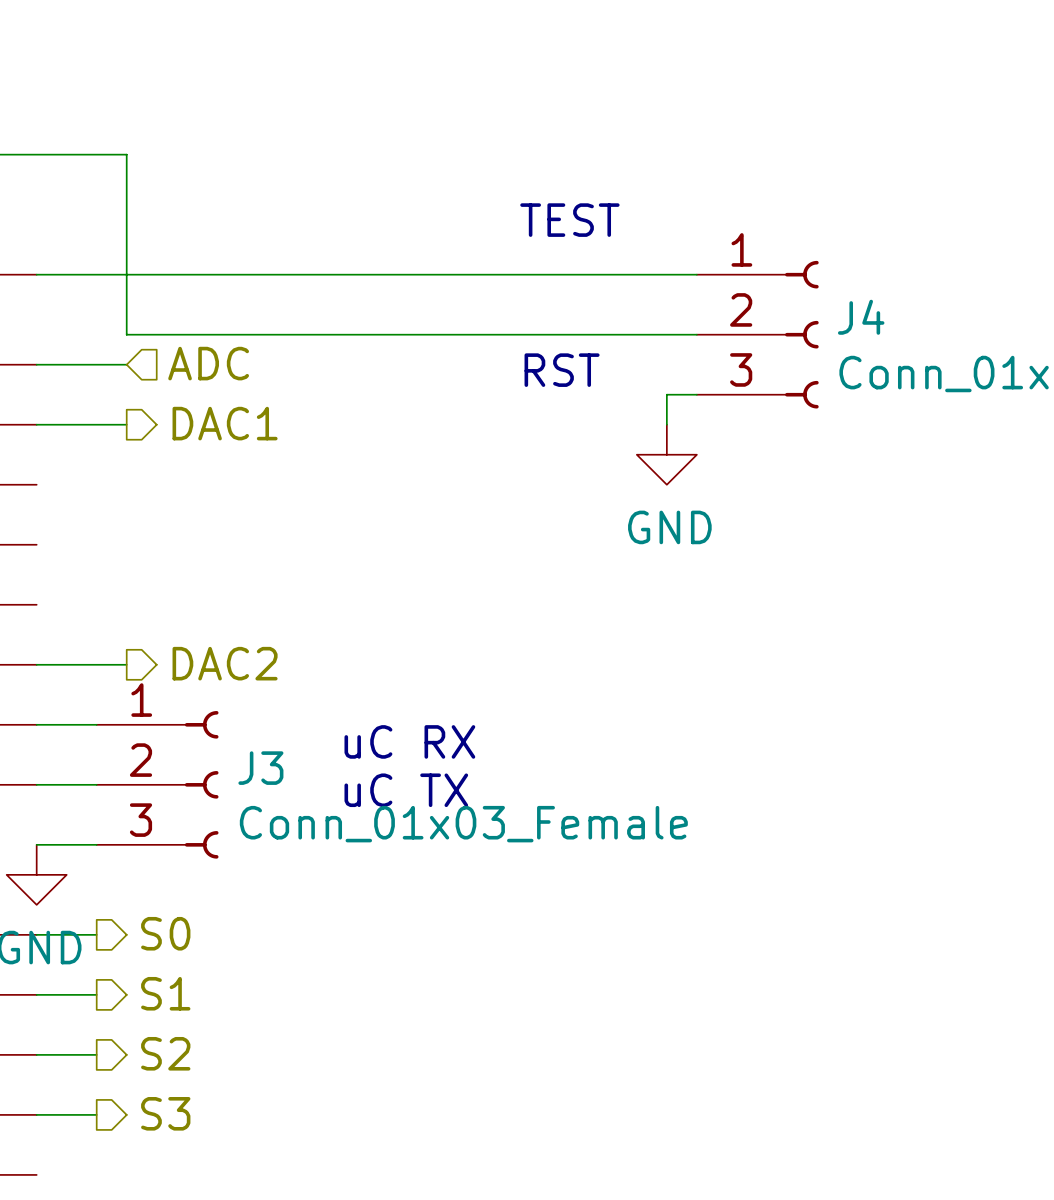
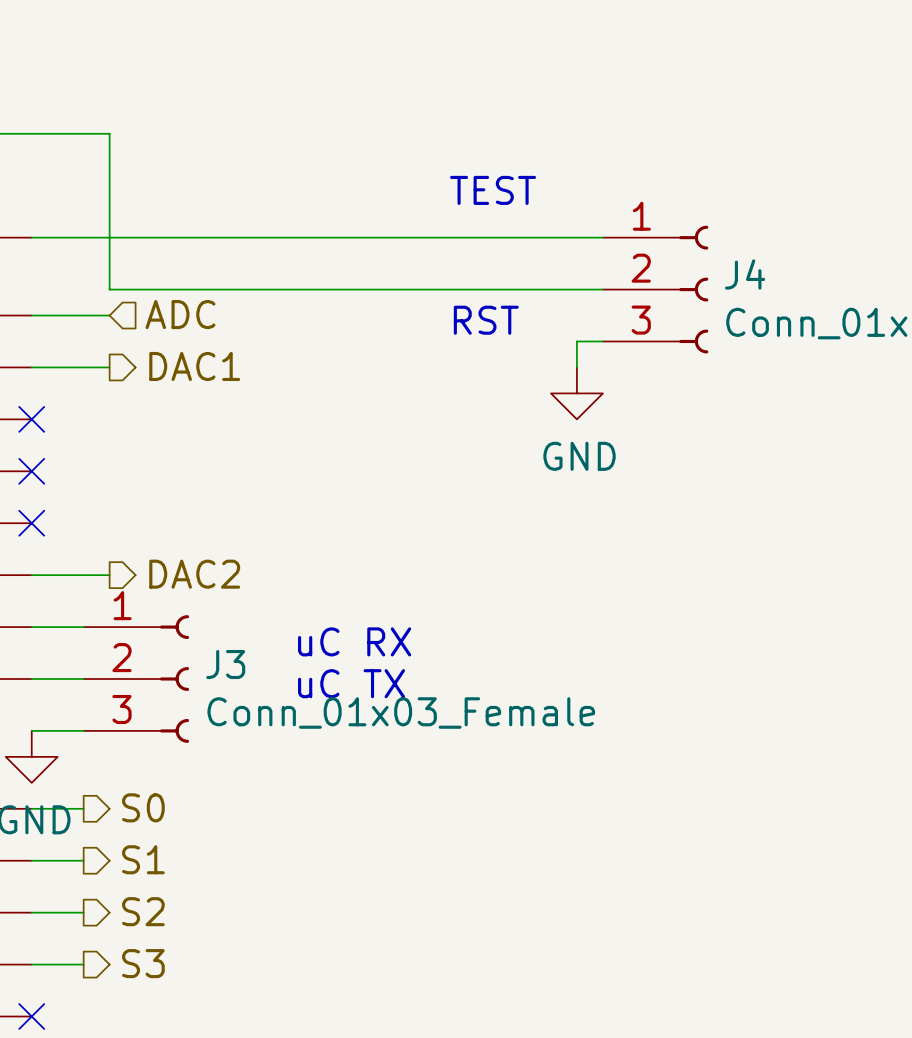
no-connect mark: none -> (31, 419)
no-connect mark: none -> (31, 471)
no-connect mark: none -> (31, 523)
no-connect mark: none -> (31, 1016)

